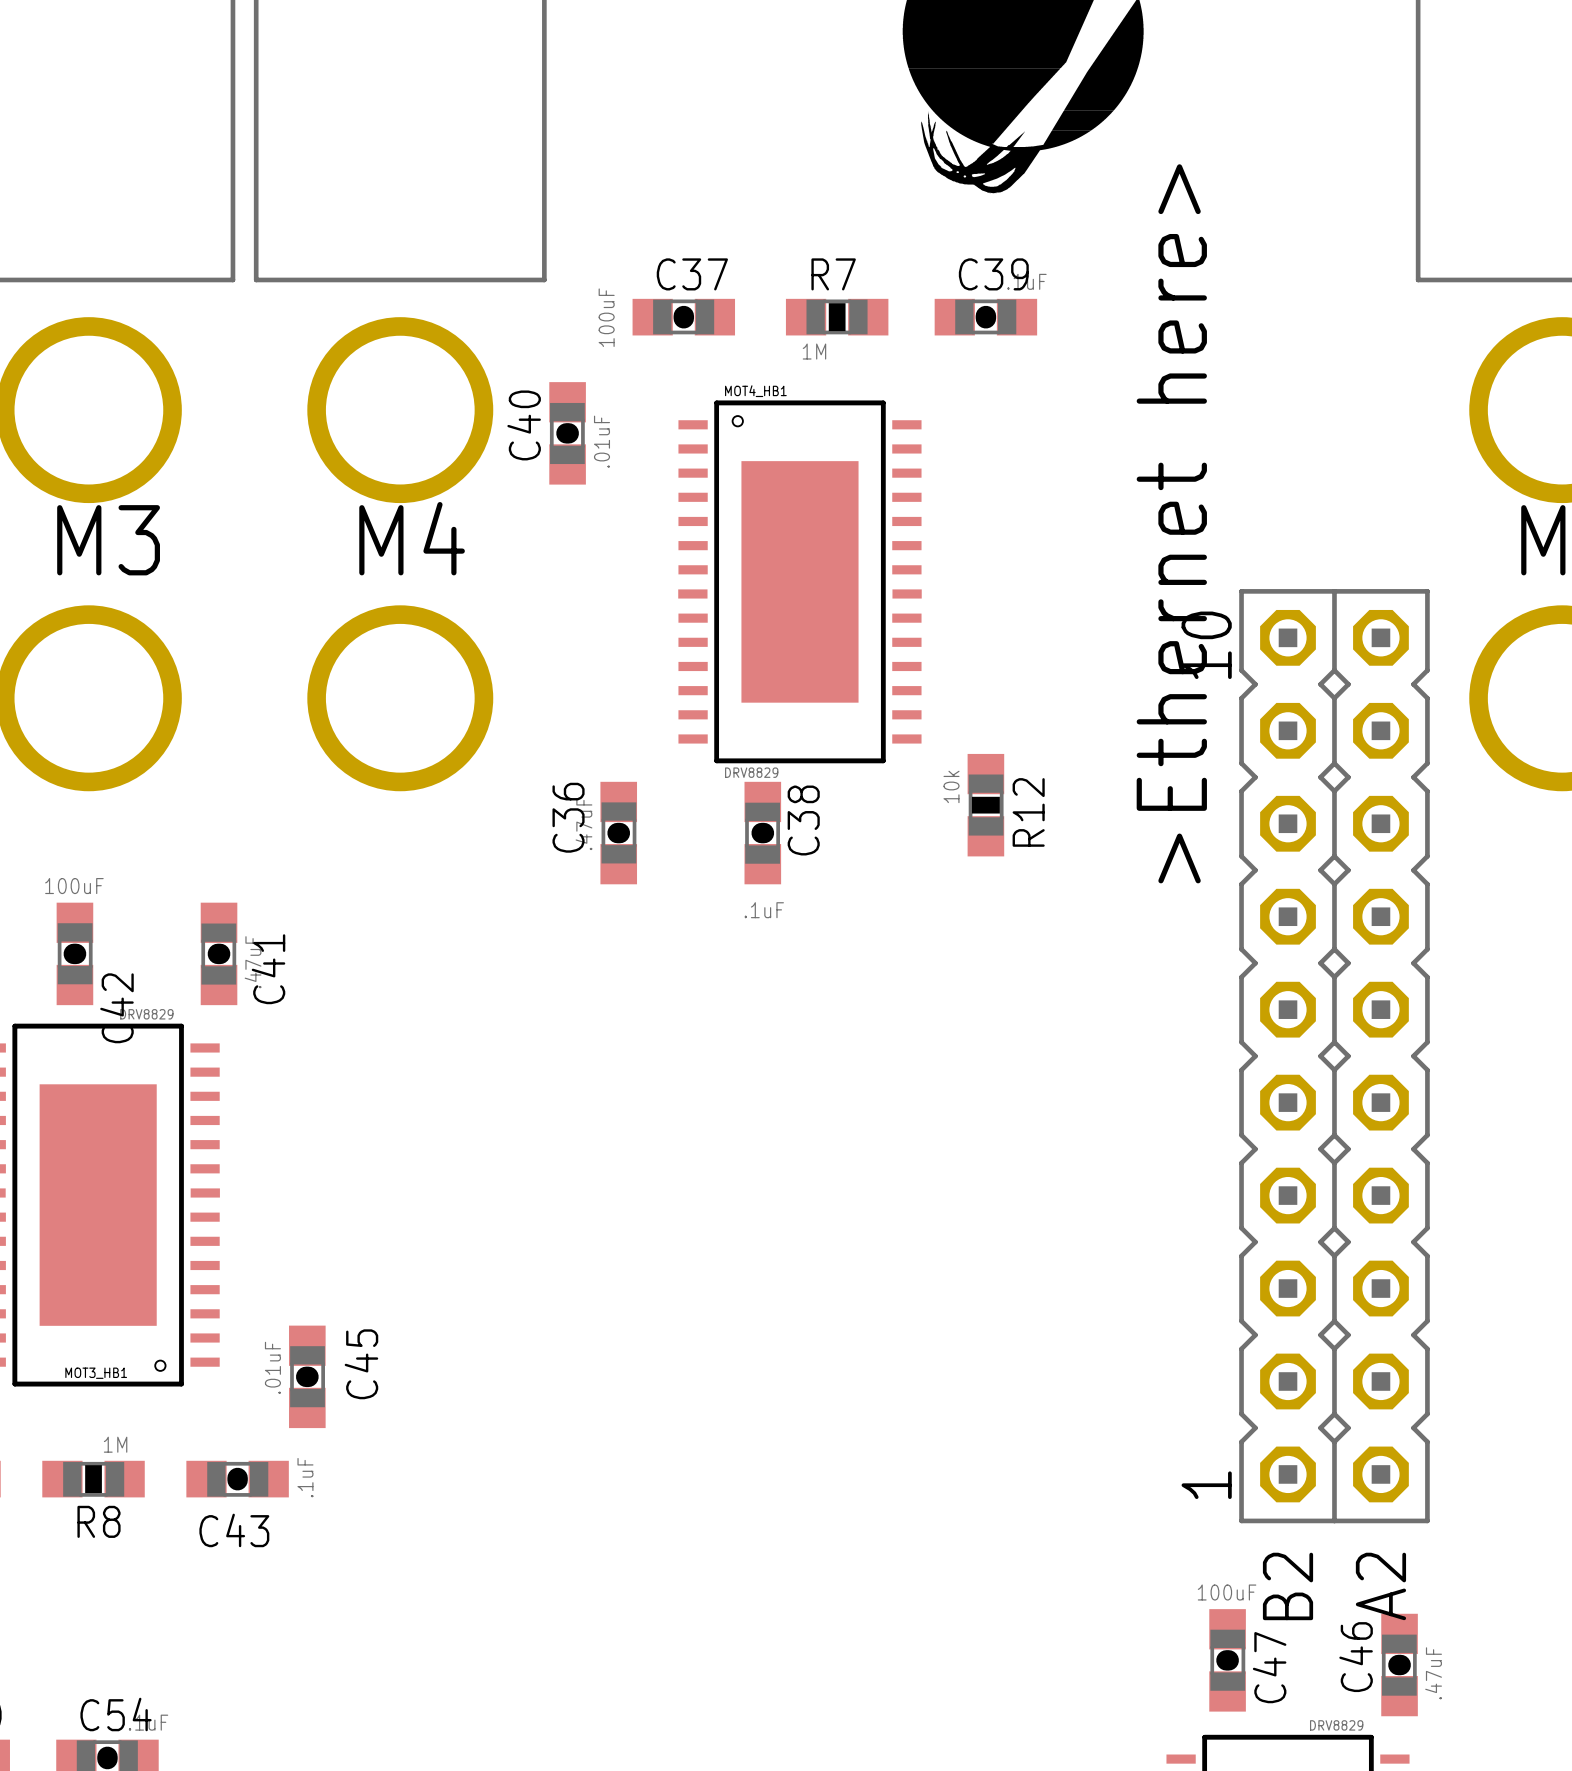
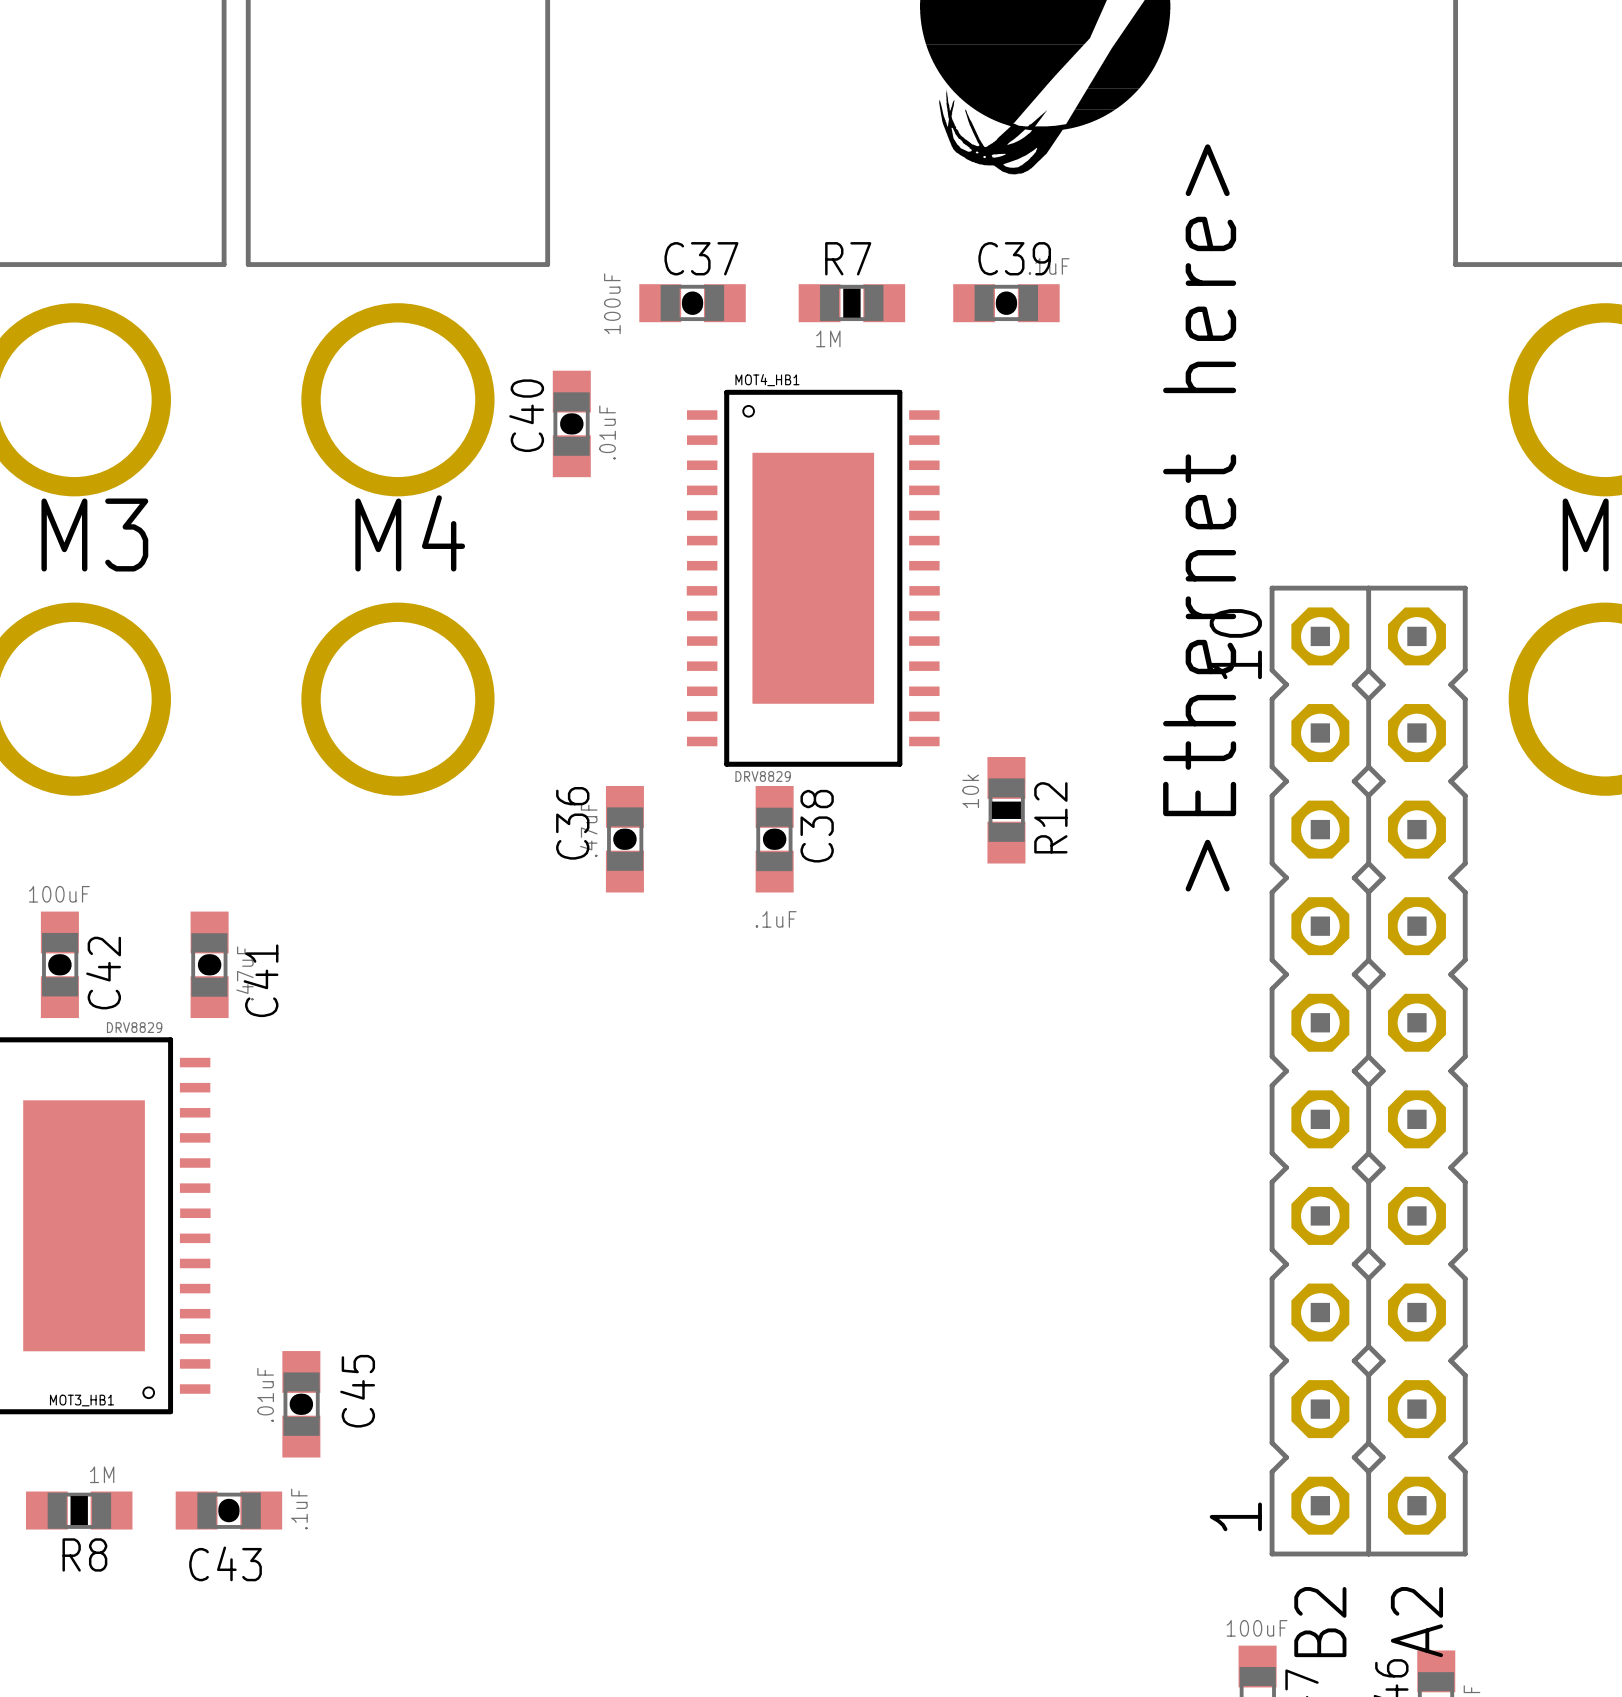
C42 name position: C42 (116, 1008) -> C42 (103, 973)

